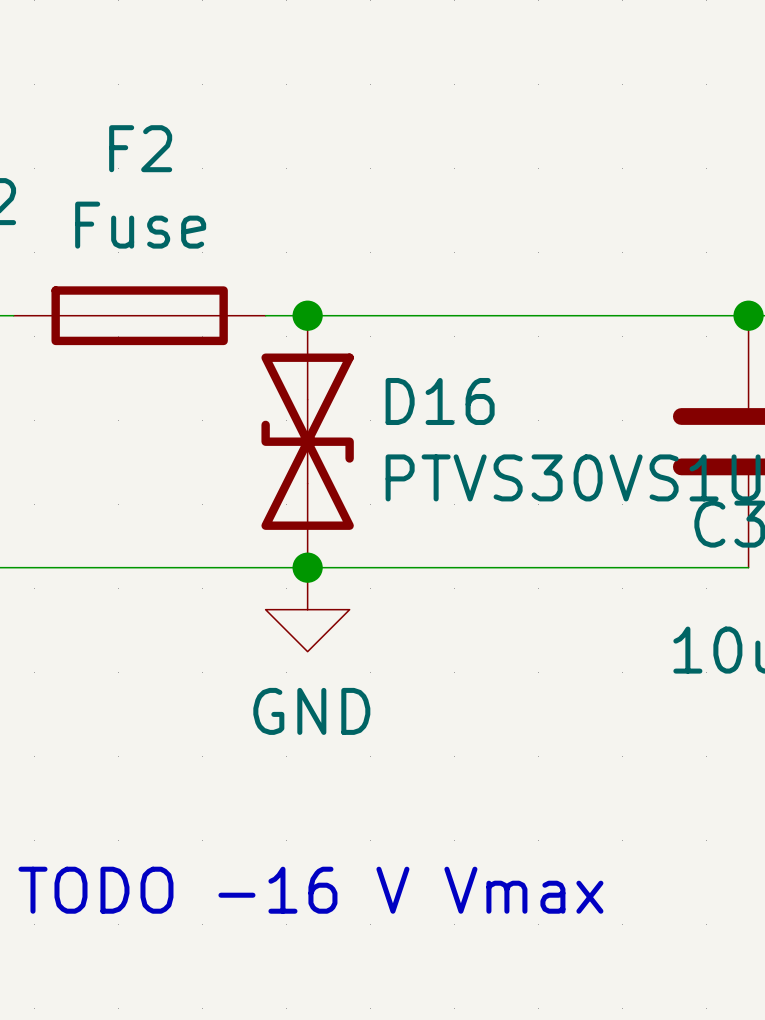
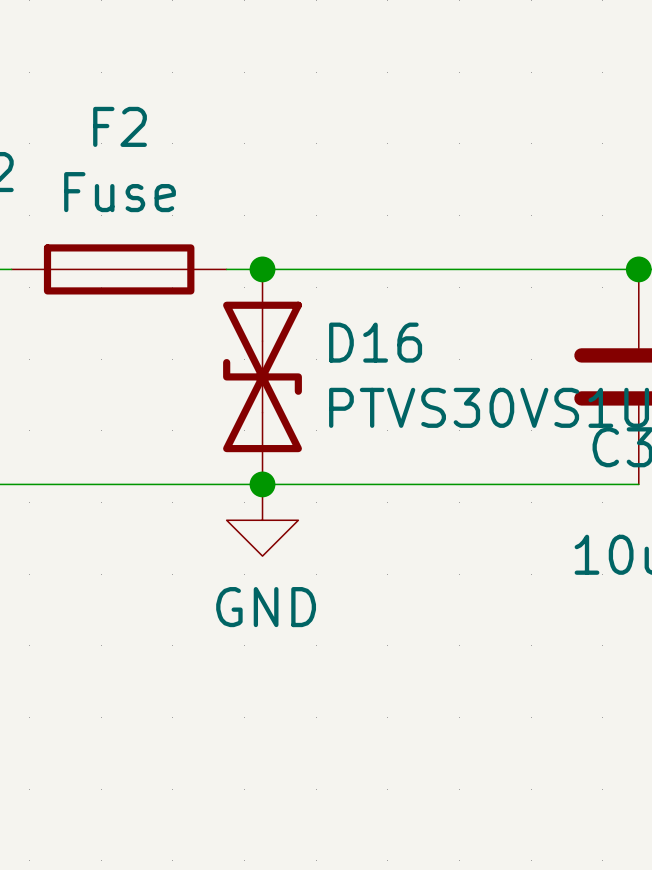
text: TODO -16 V Vmax (310, 890) -> none

